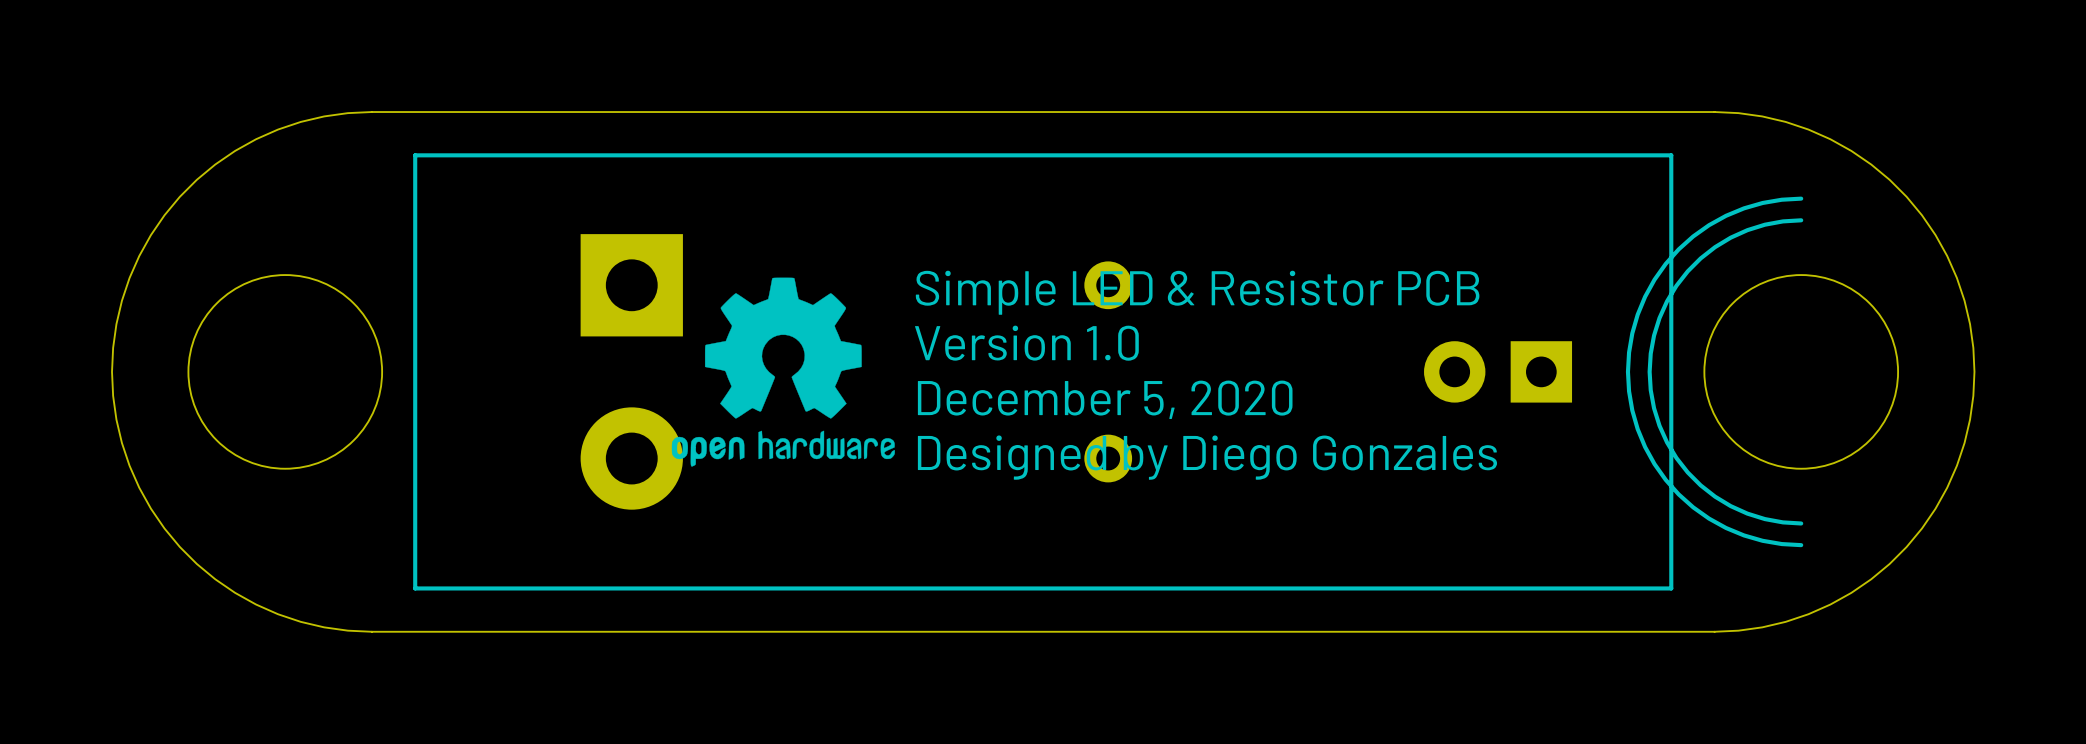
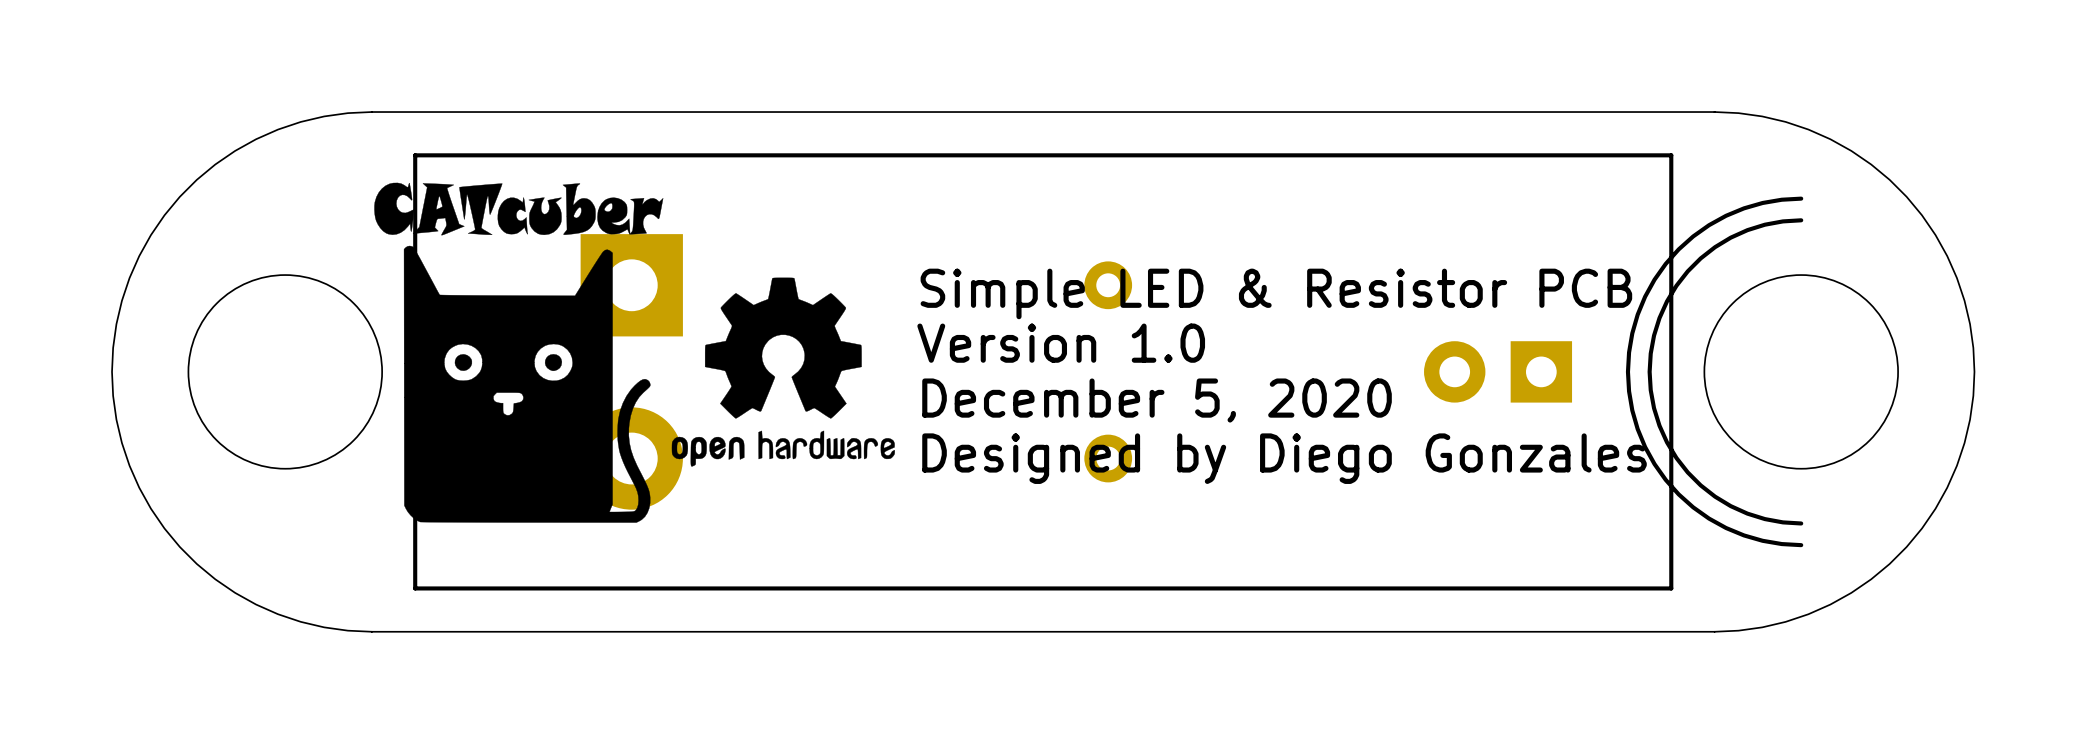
drawing: none -> [374, 182, 664, 523]

